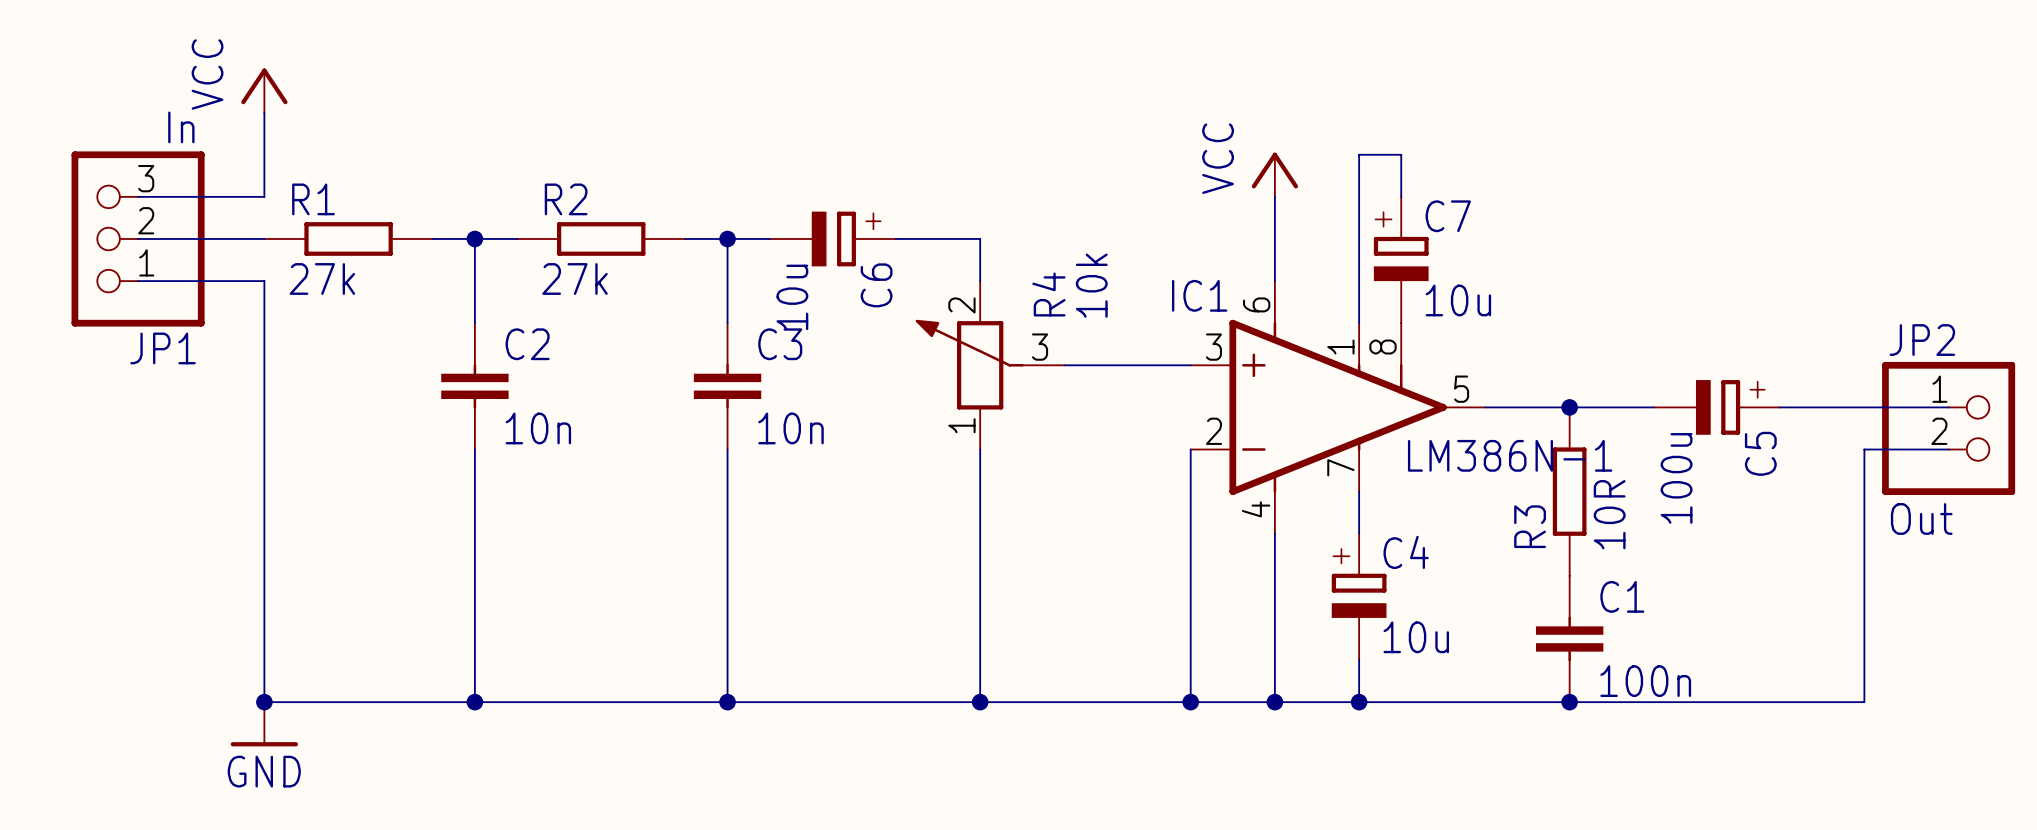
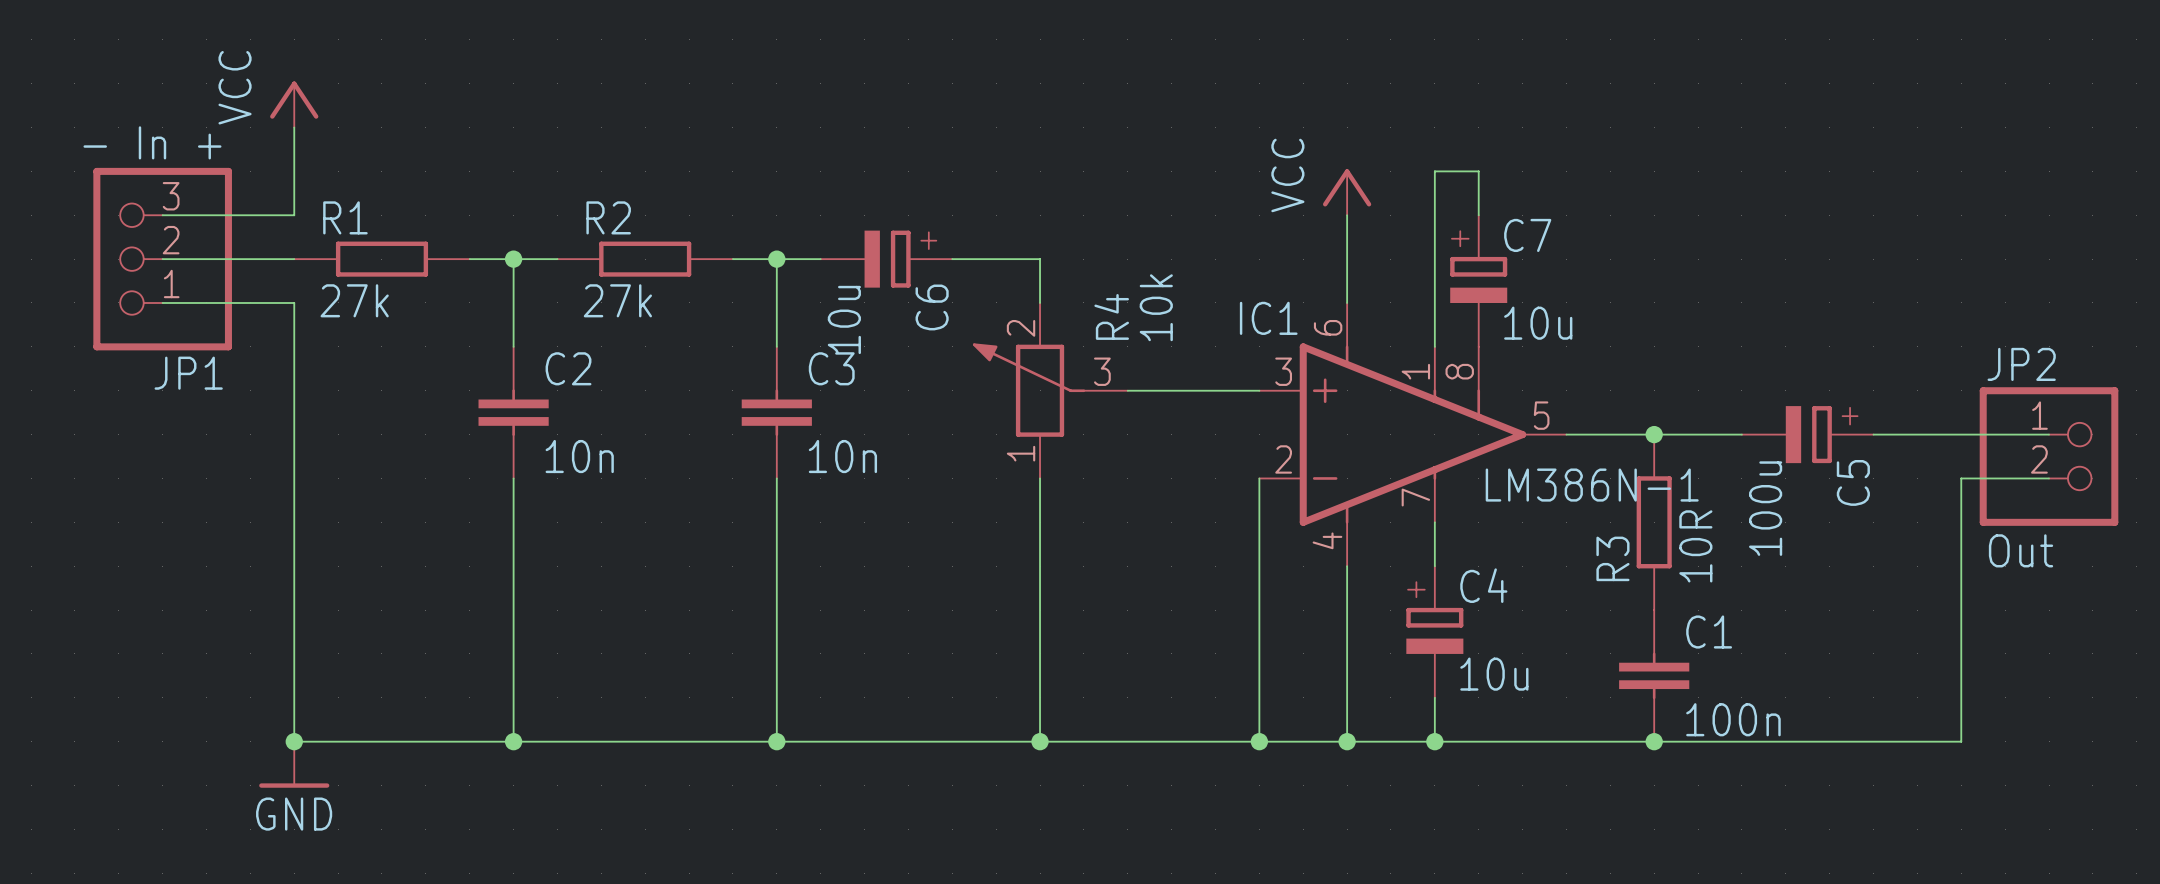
JP1 value: In (181, 127) -> - In + (152, 142)

